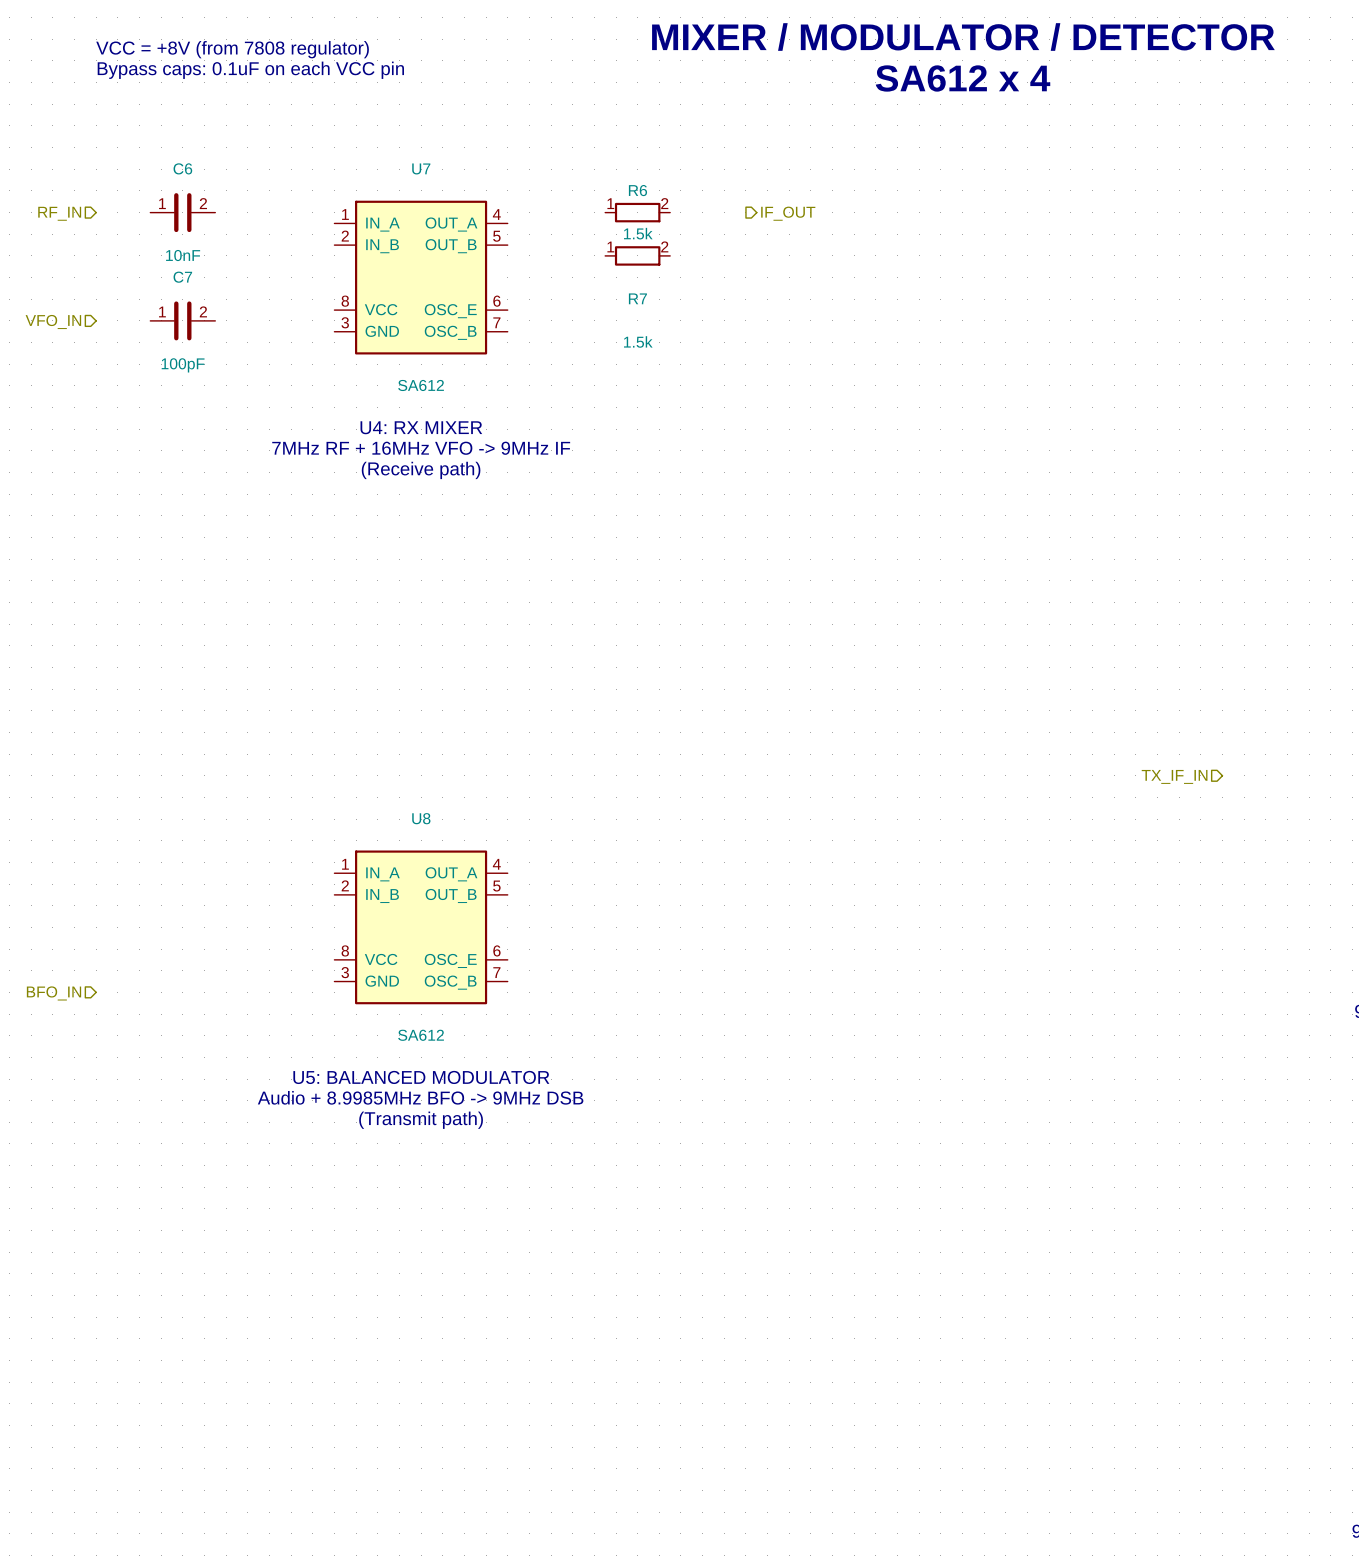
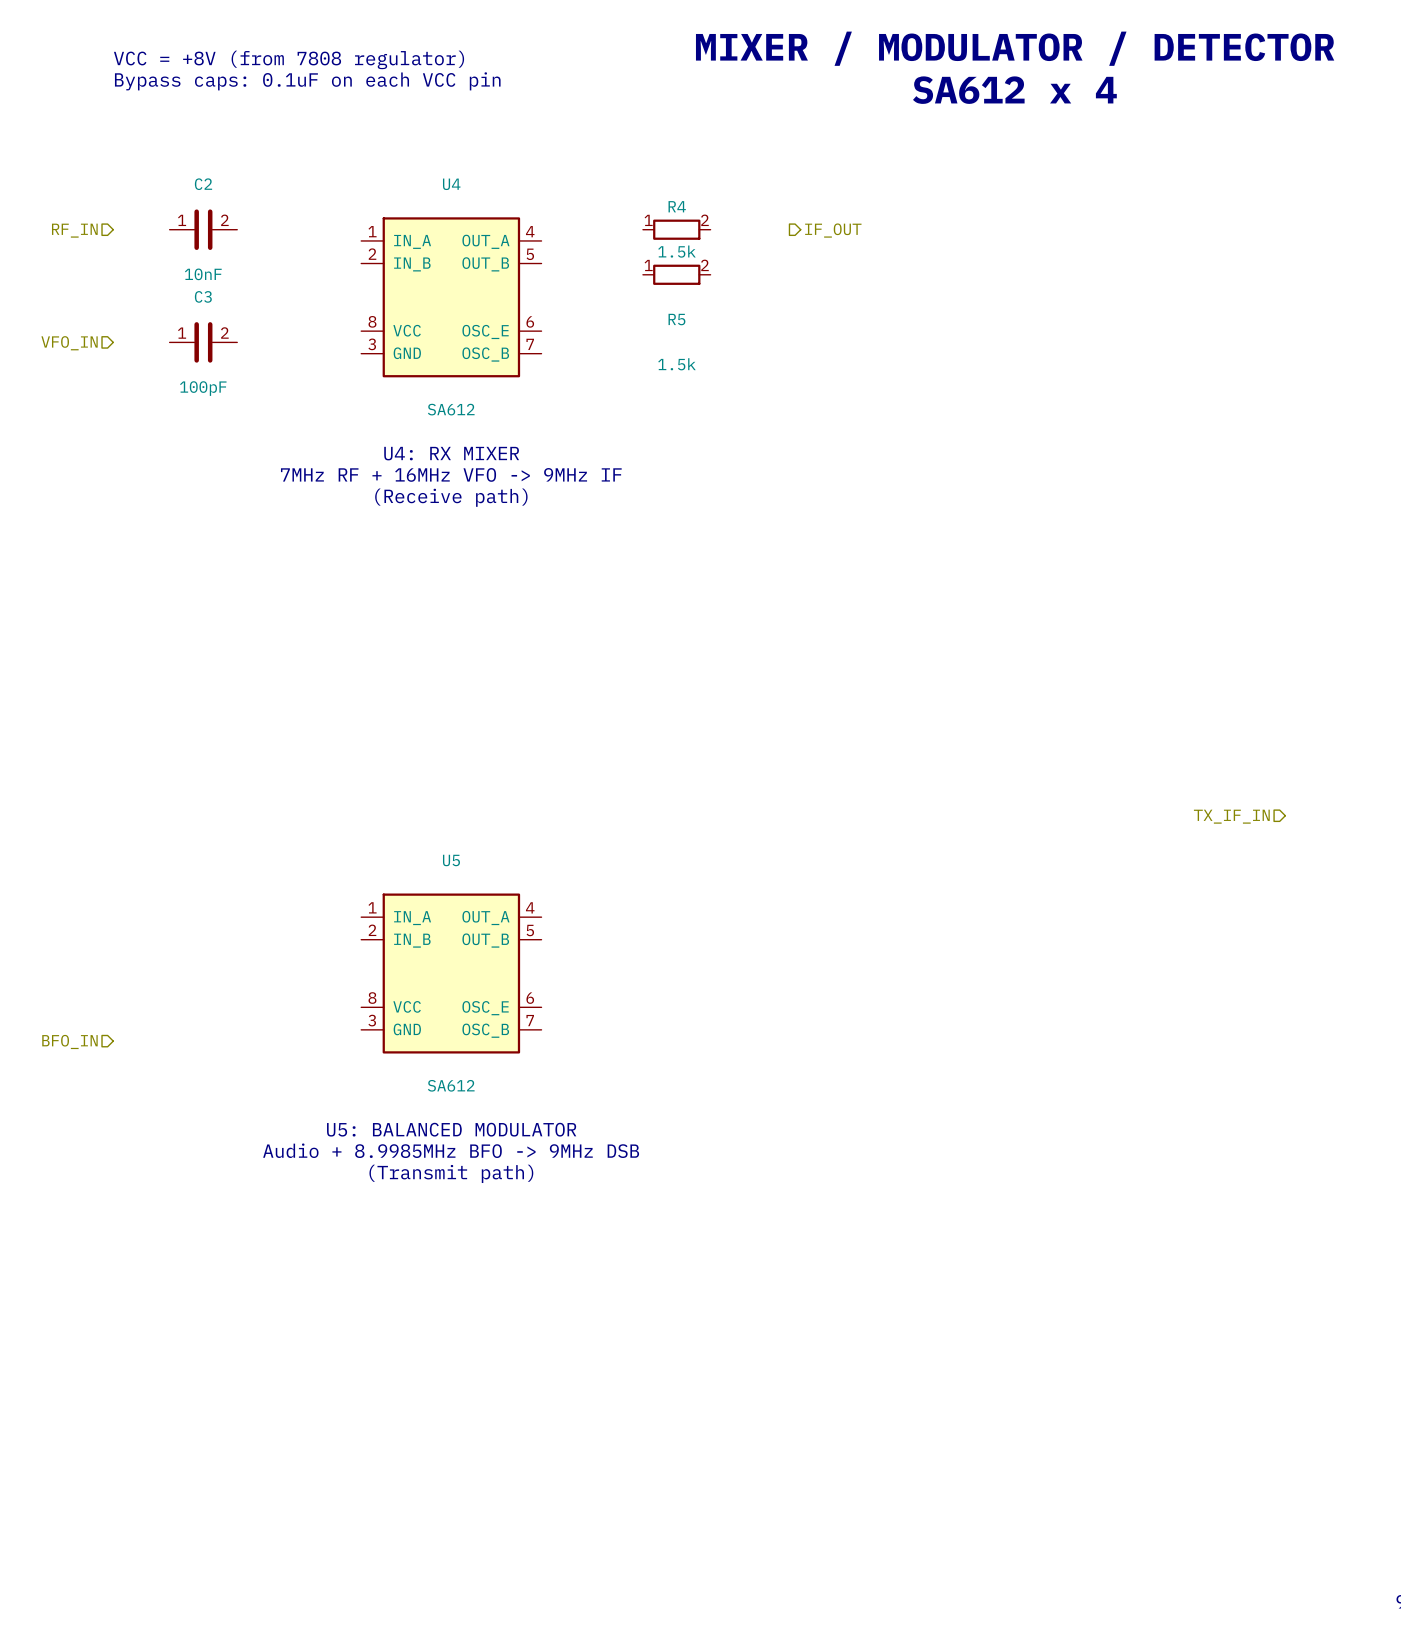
C6 name: C6 (182, 168) -> C2 (203, 184)
U7 name: U7 (421, 168) -> U4 (451, 184)
R6 name: R6 (637, 190) -> R4 (677, 206)
C7 name: C7 (182, 277) -> C3 (203, 296)
R7 name: R7 (637, 298) -> R5 (676, 319)
U8 name: U8 (421, 818) -> U5 (451, 860)

